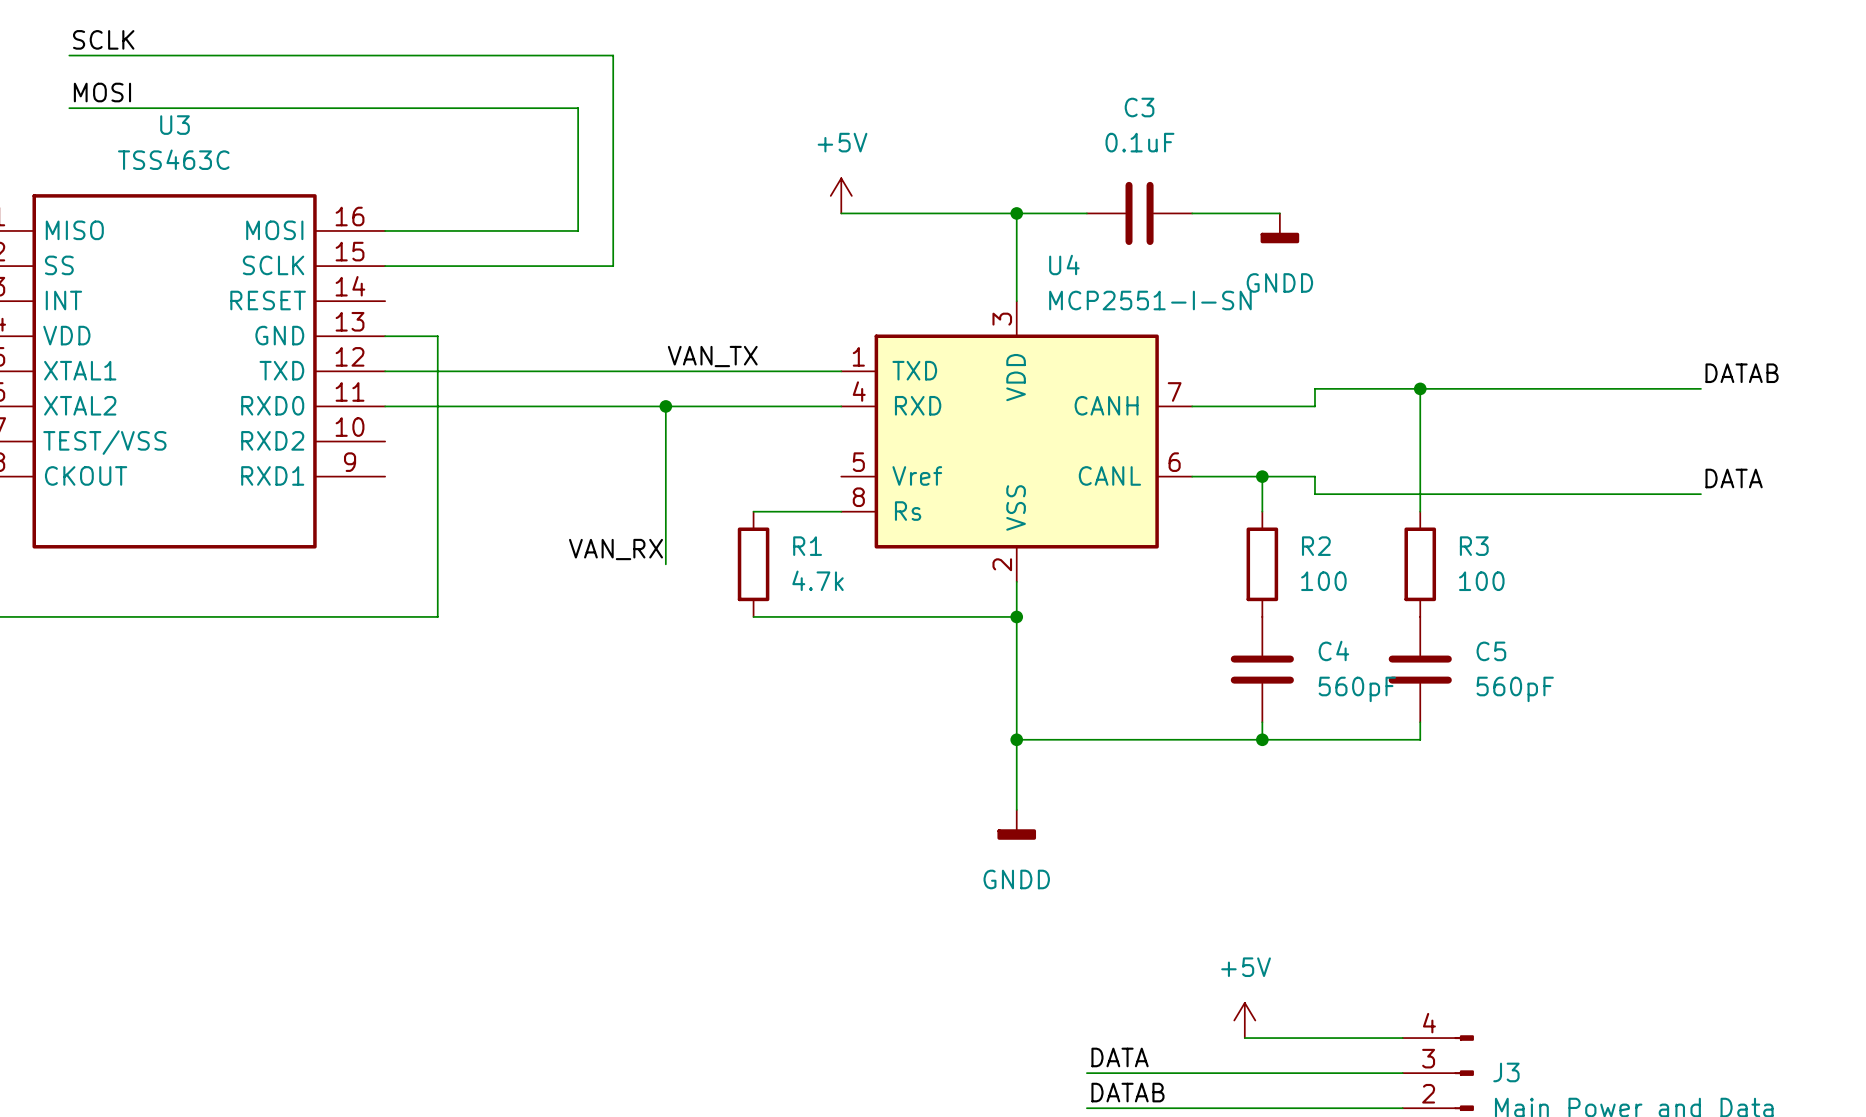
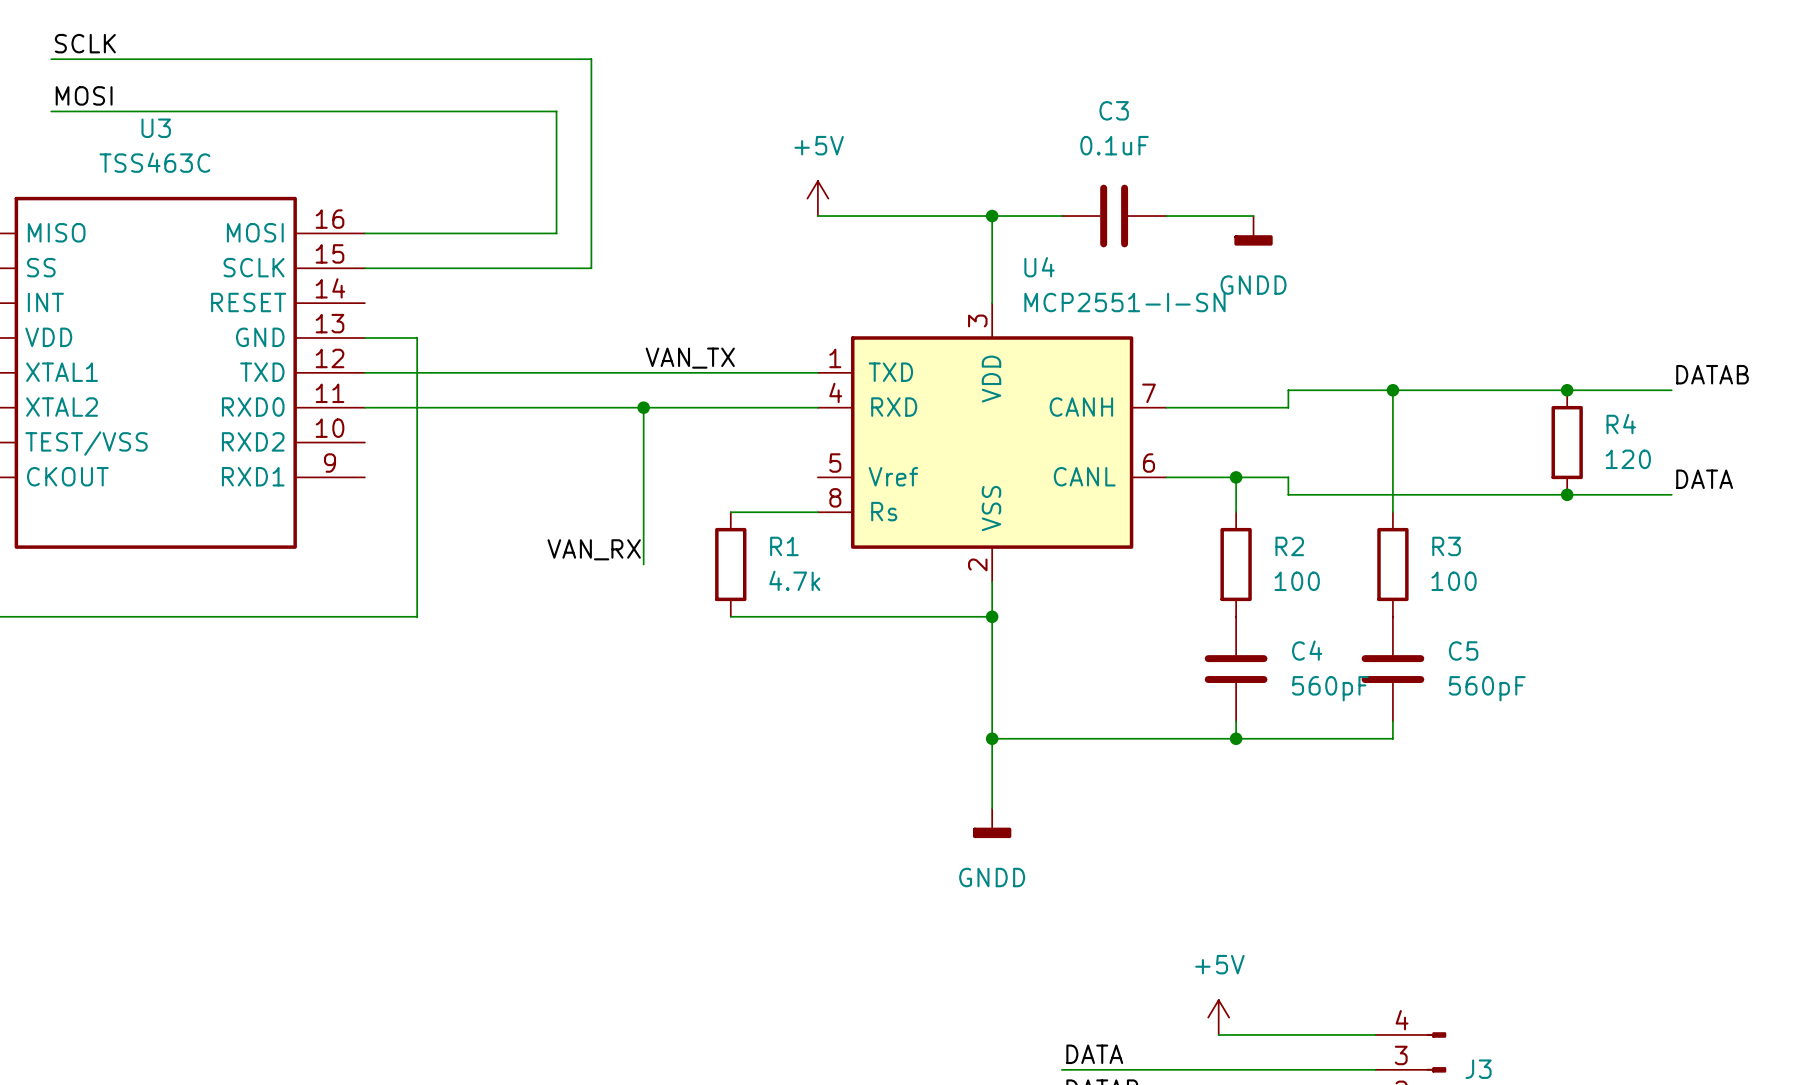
junction: none -> (1567, 390)
R4: none -> 120 (1567, 442)
junction: none -> (1567, 494)

